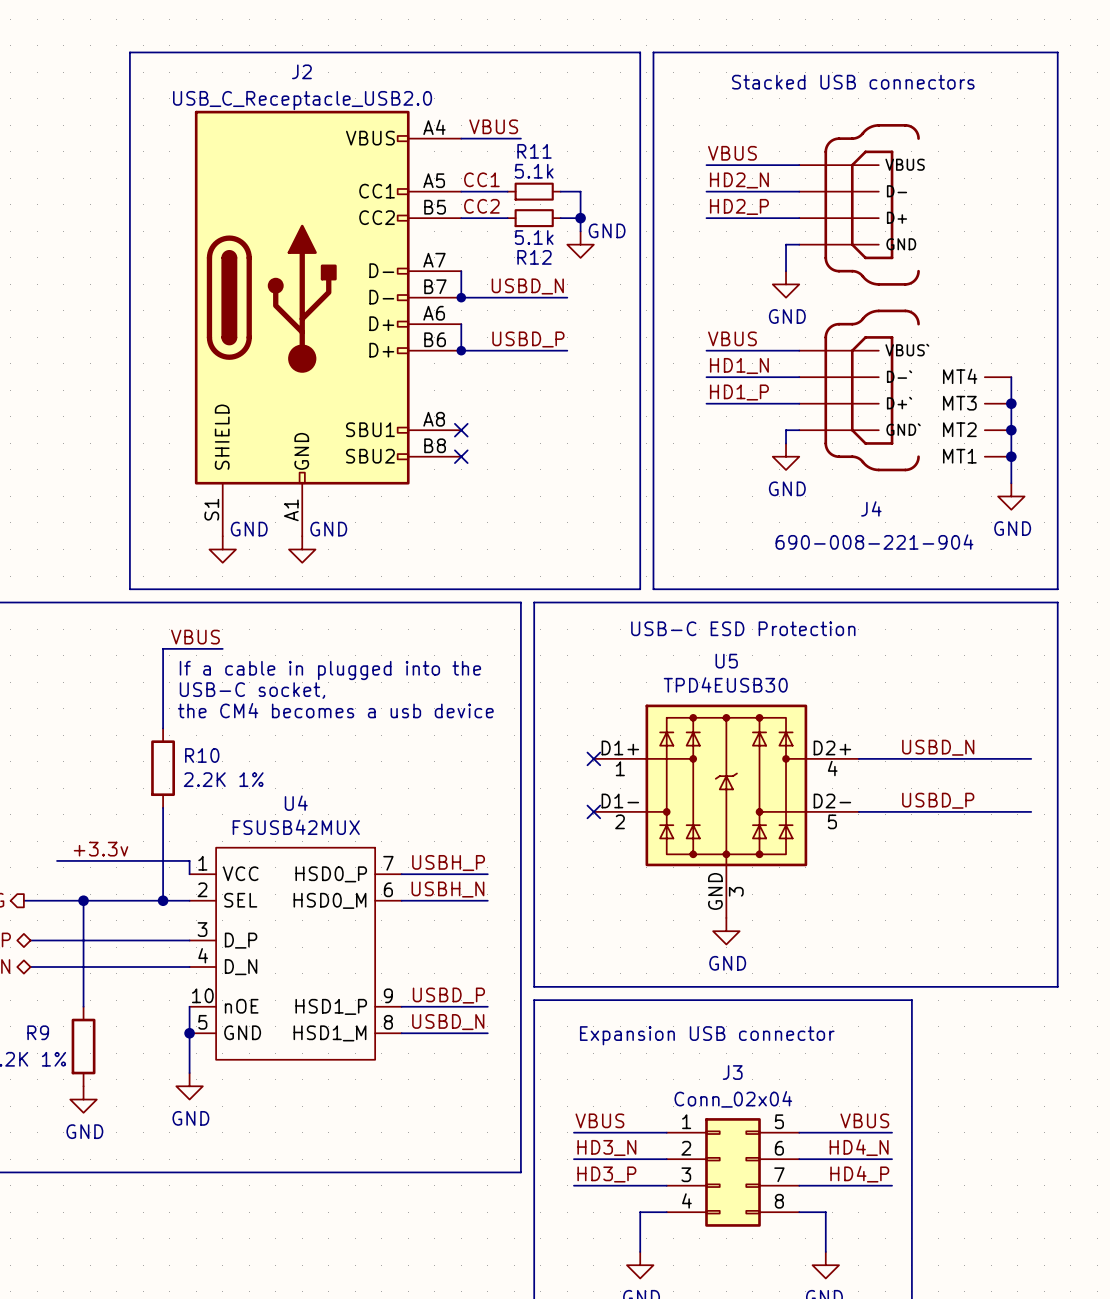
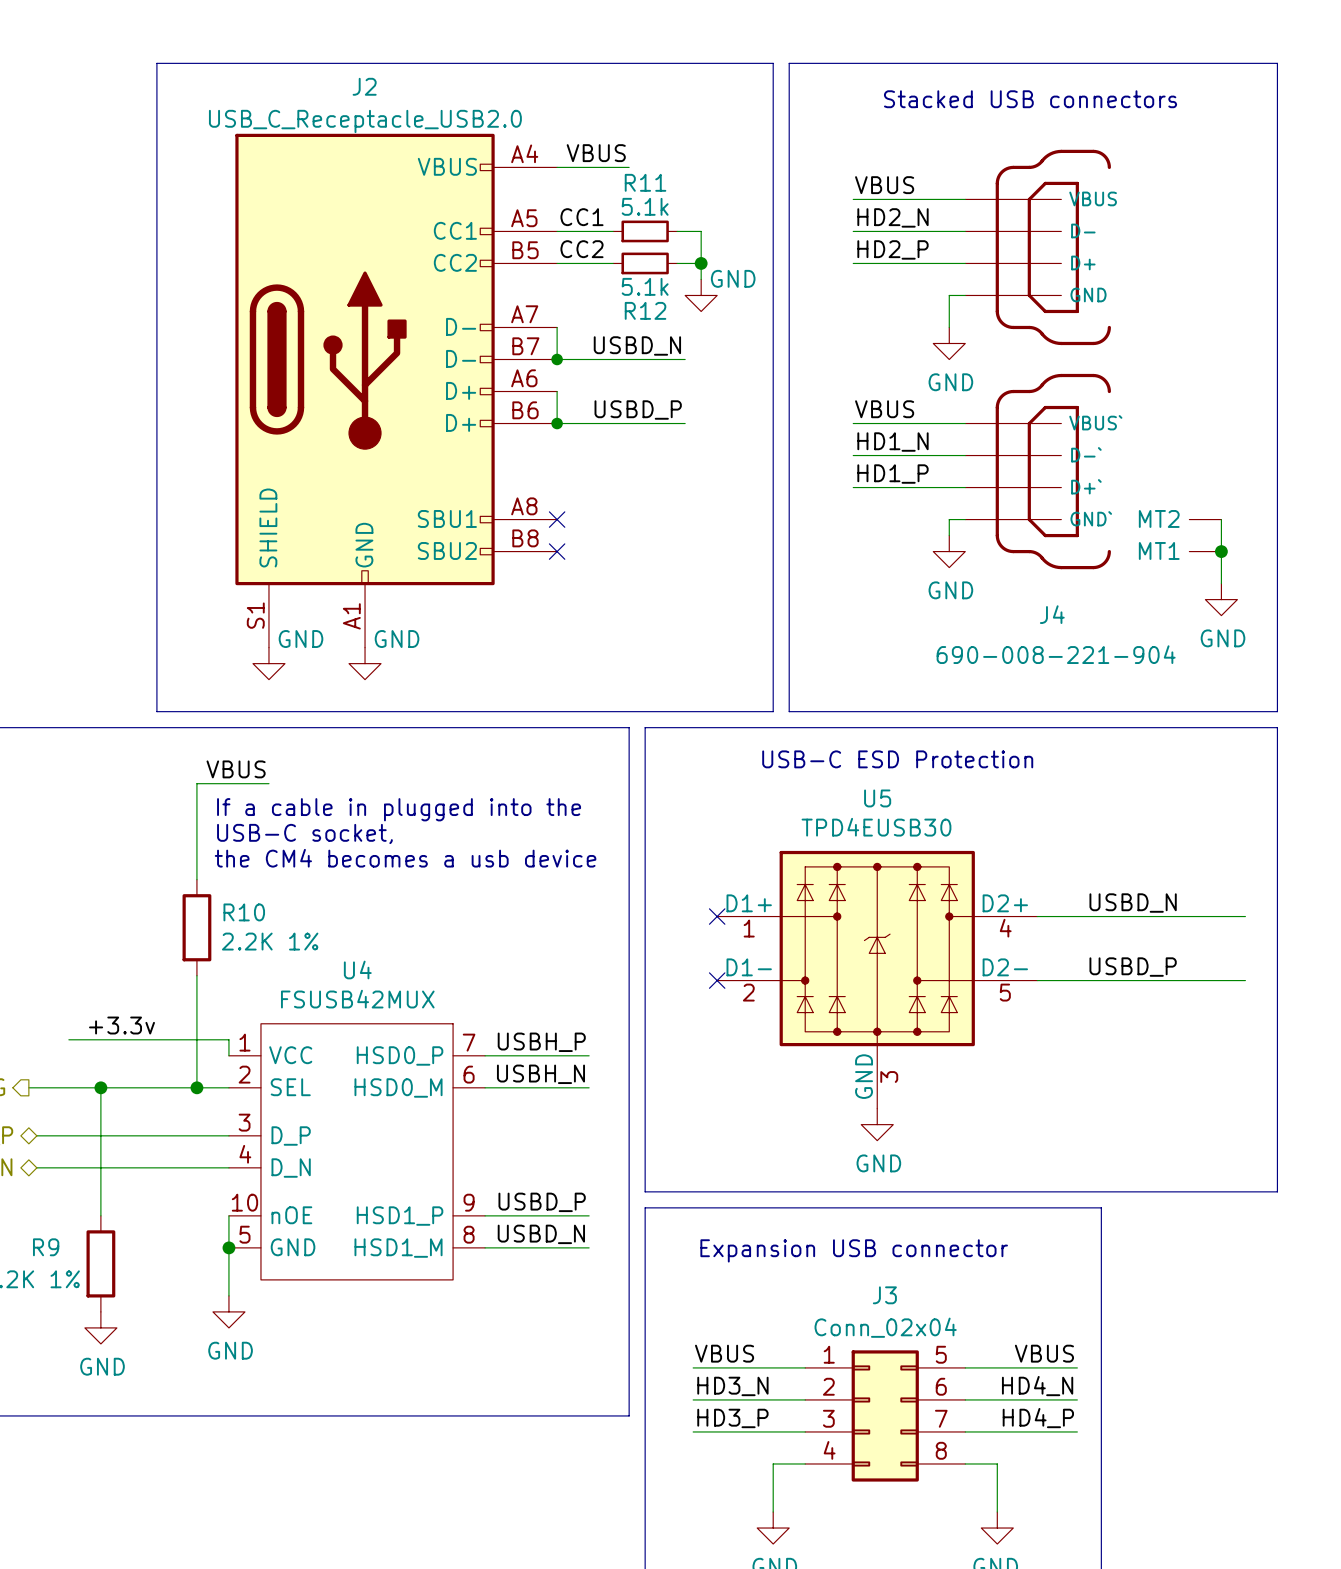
J4 symbol: [799, 124, 1012, 472] -> [965, 149, 1222, 570]
wire: (1011, 377) (1011, 430) -> none
junction: (1011, 403) -> none
junction: (1011, 430) -> none

